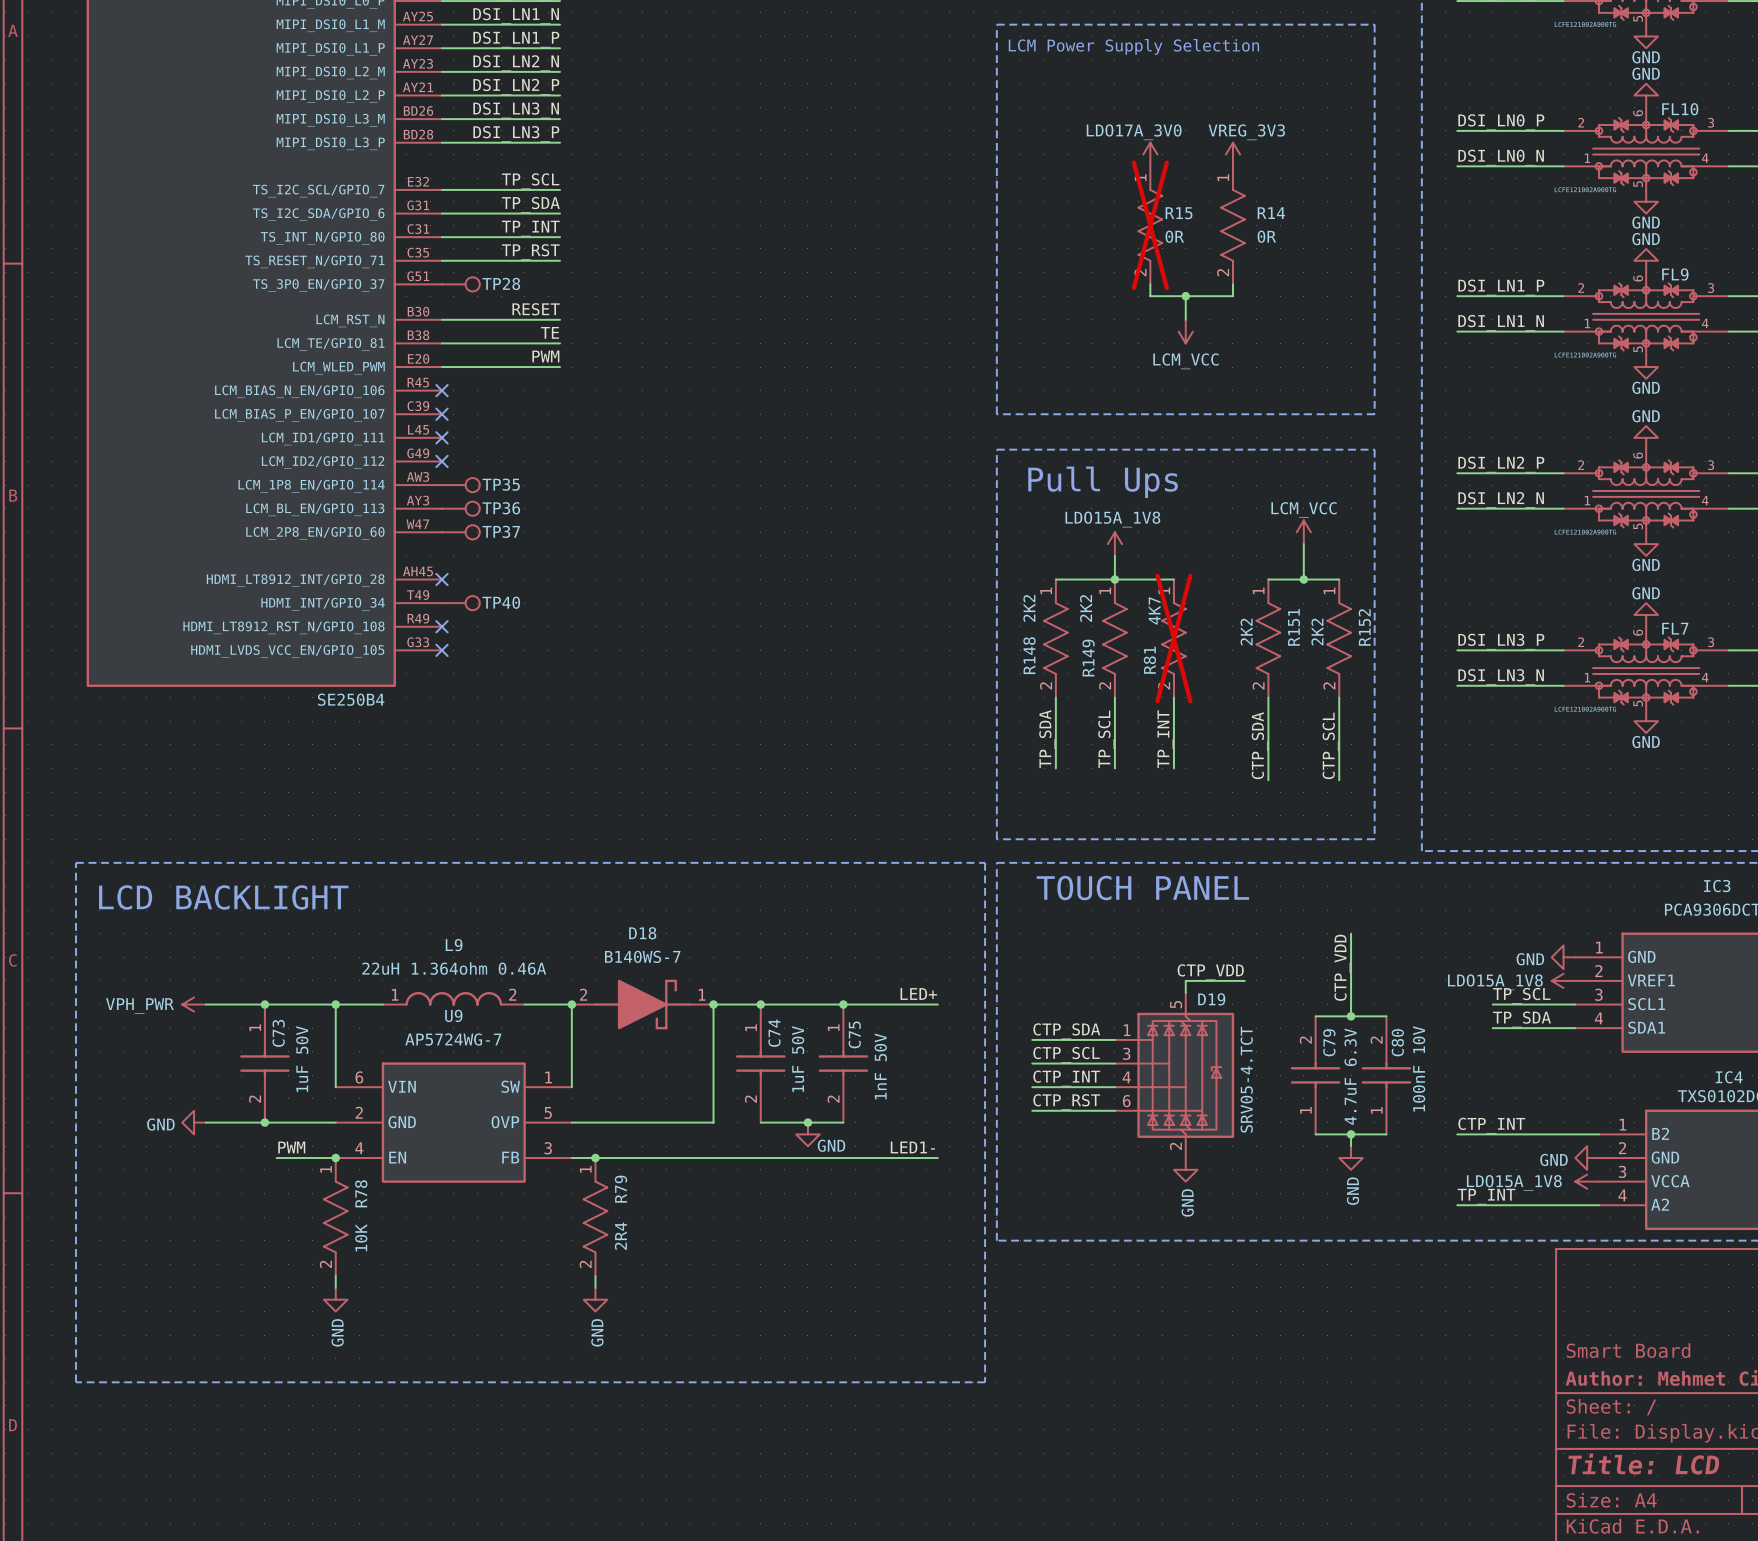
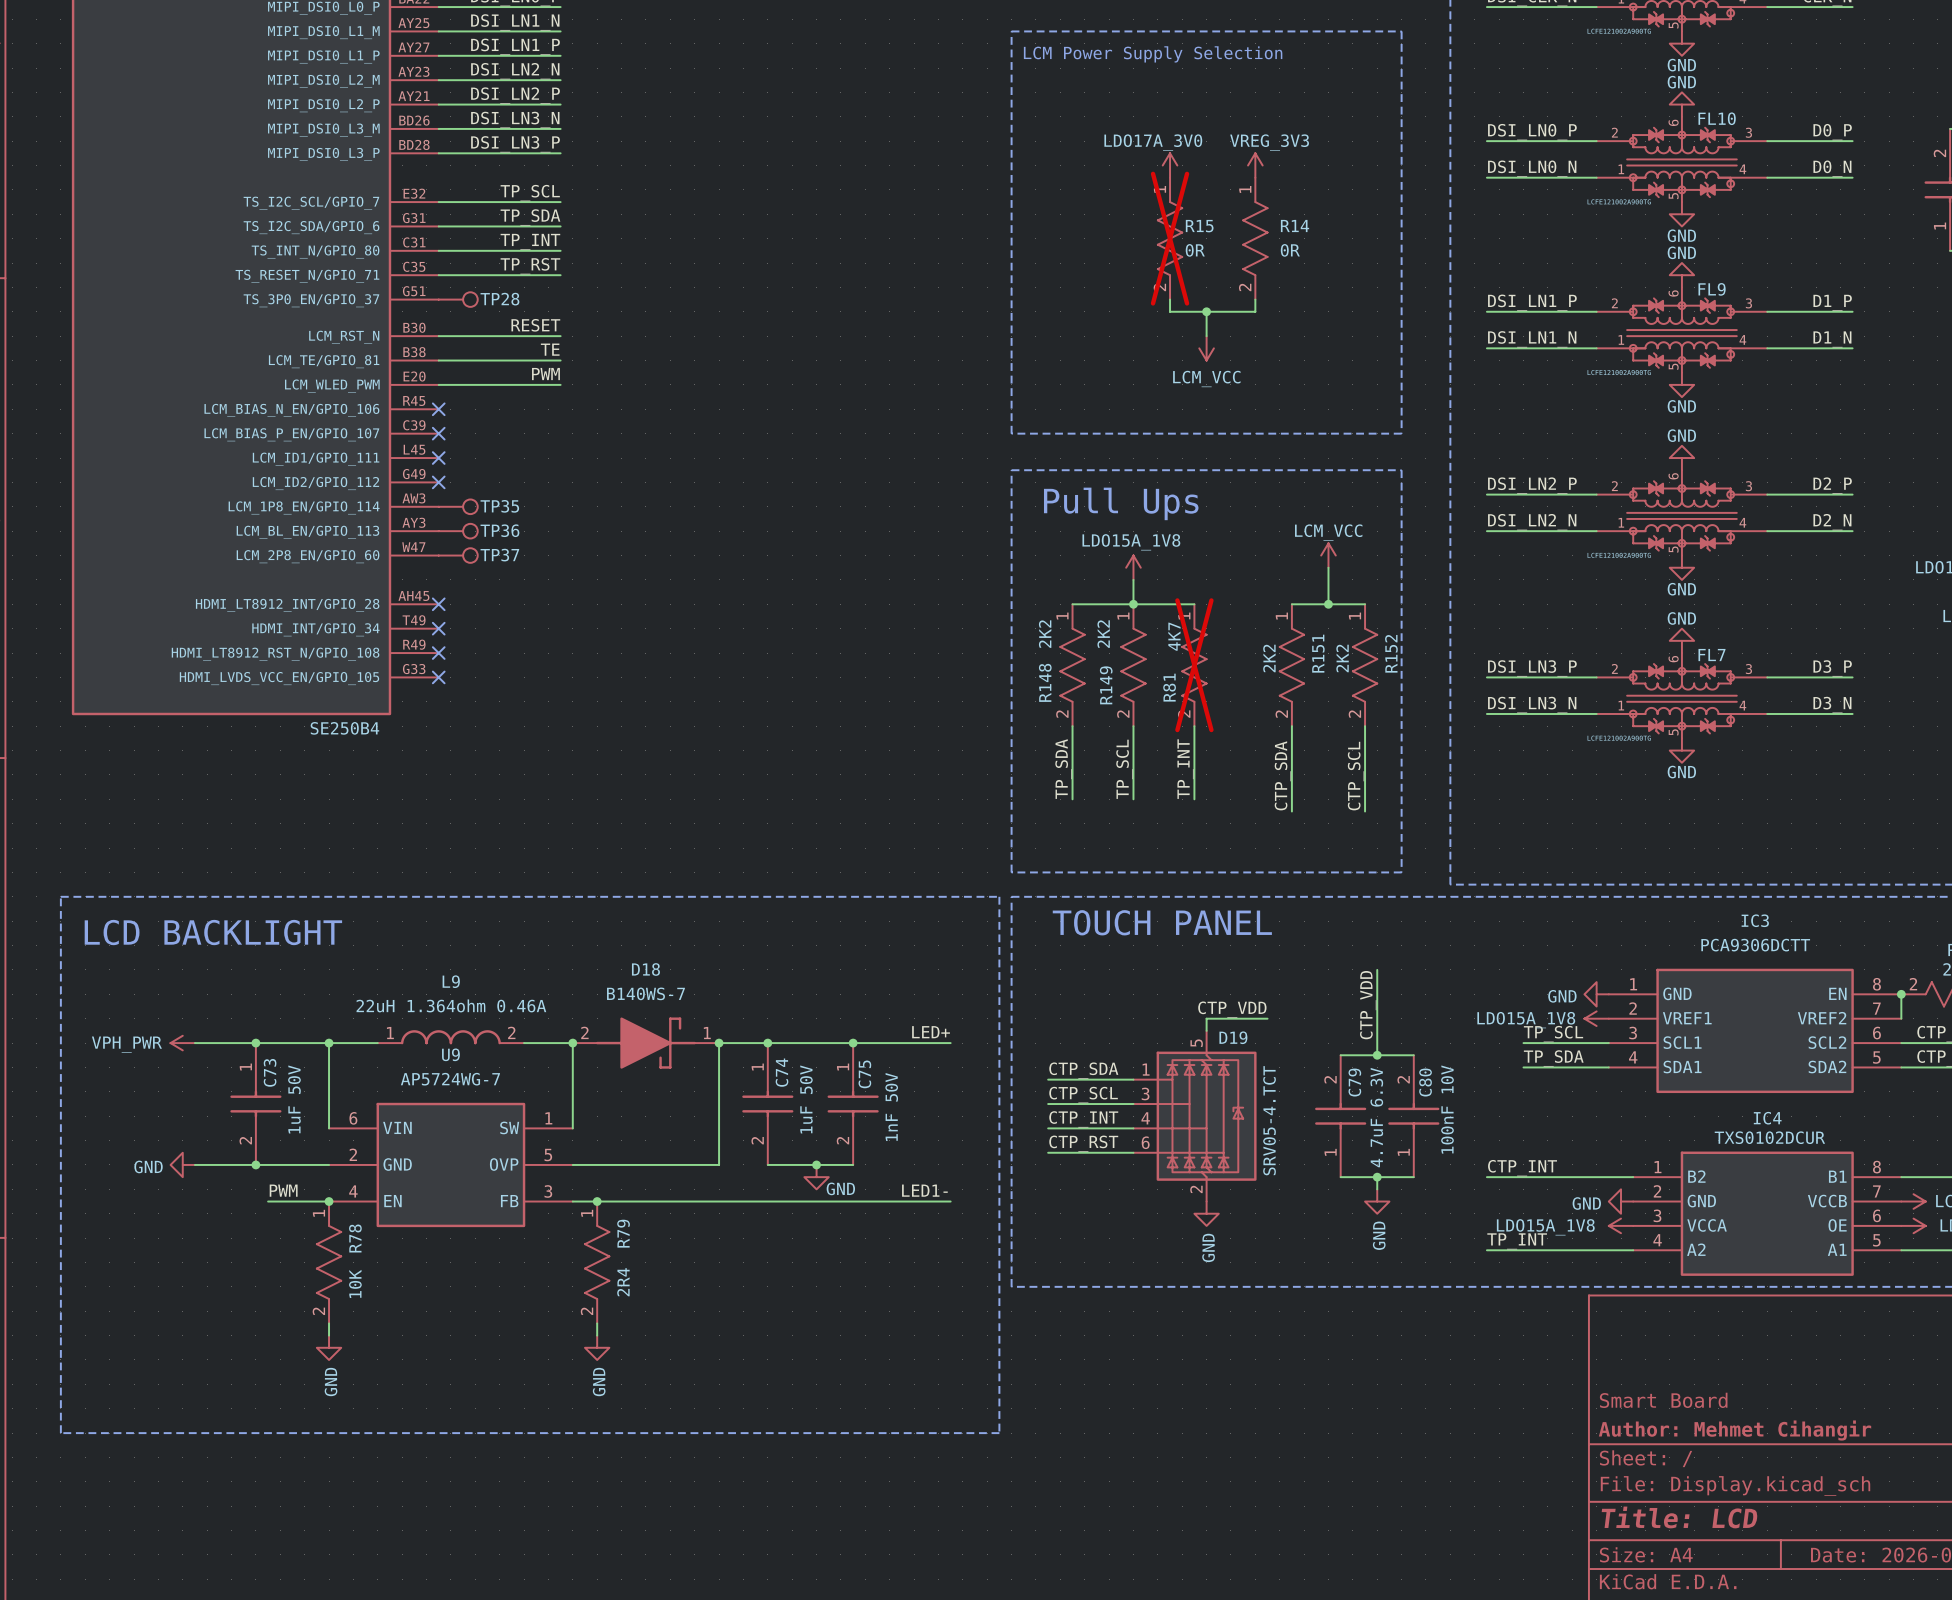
no-connect mark: none -> (438, 628)
TP40: (460, 603) -> none

